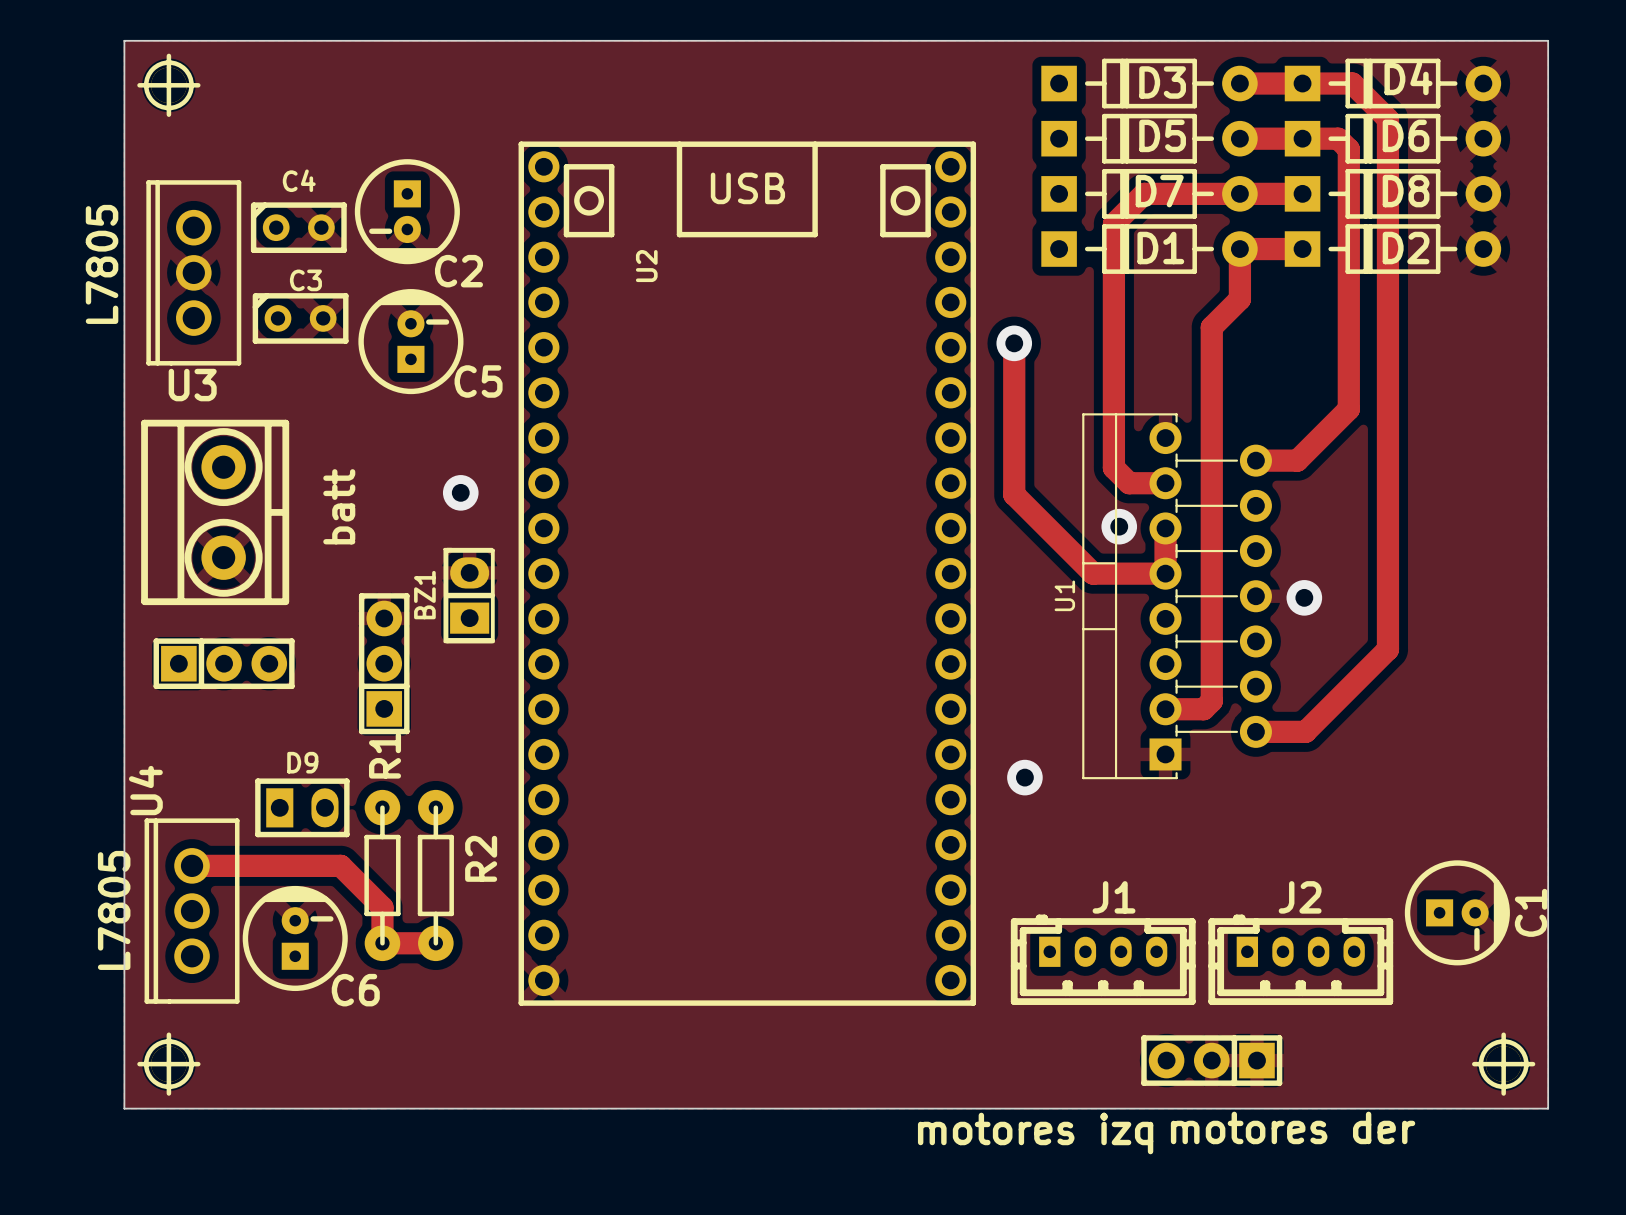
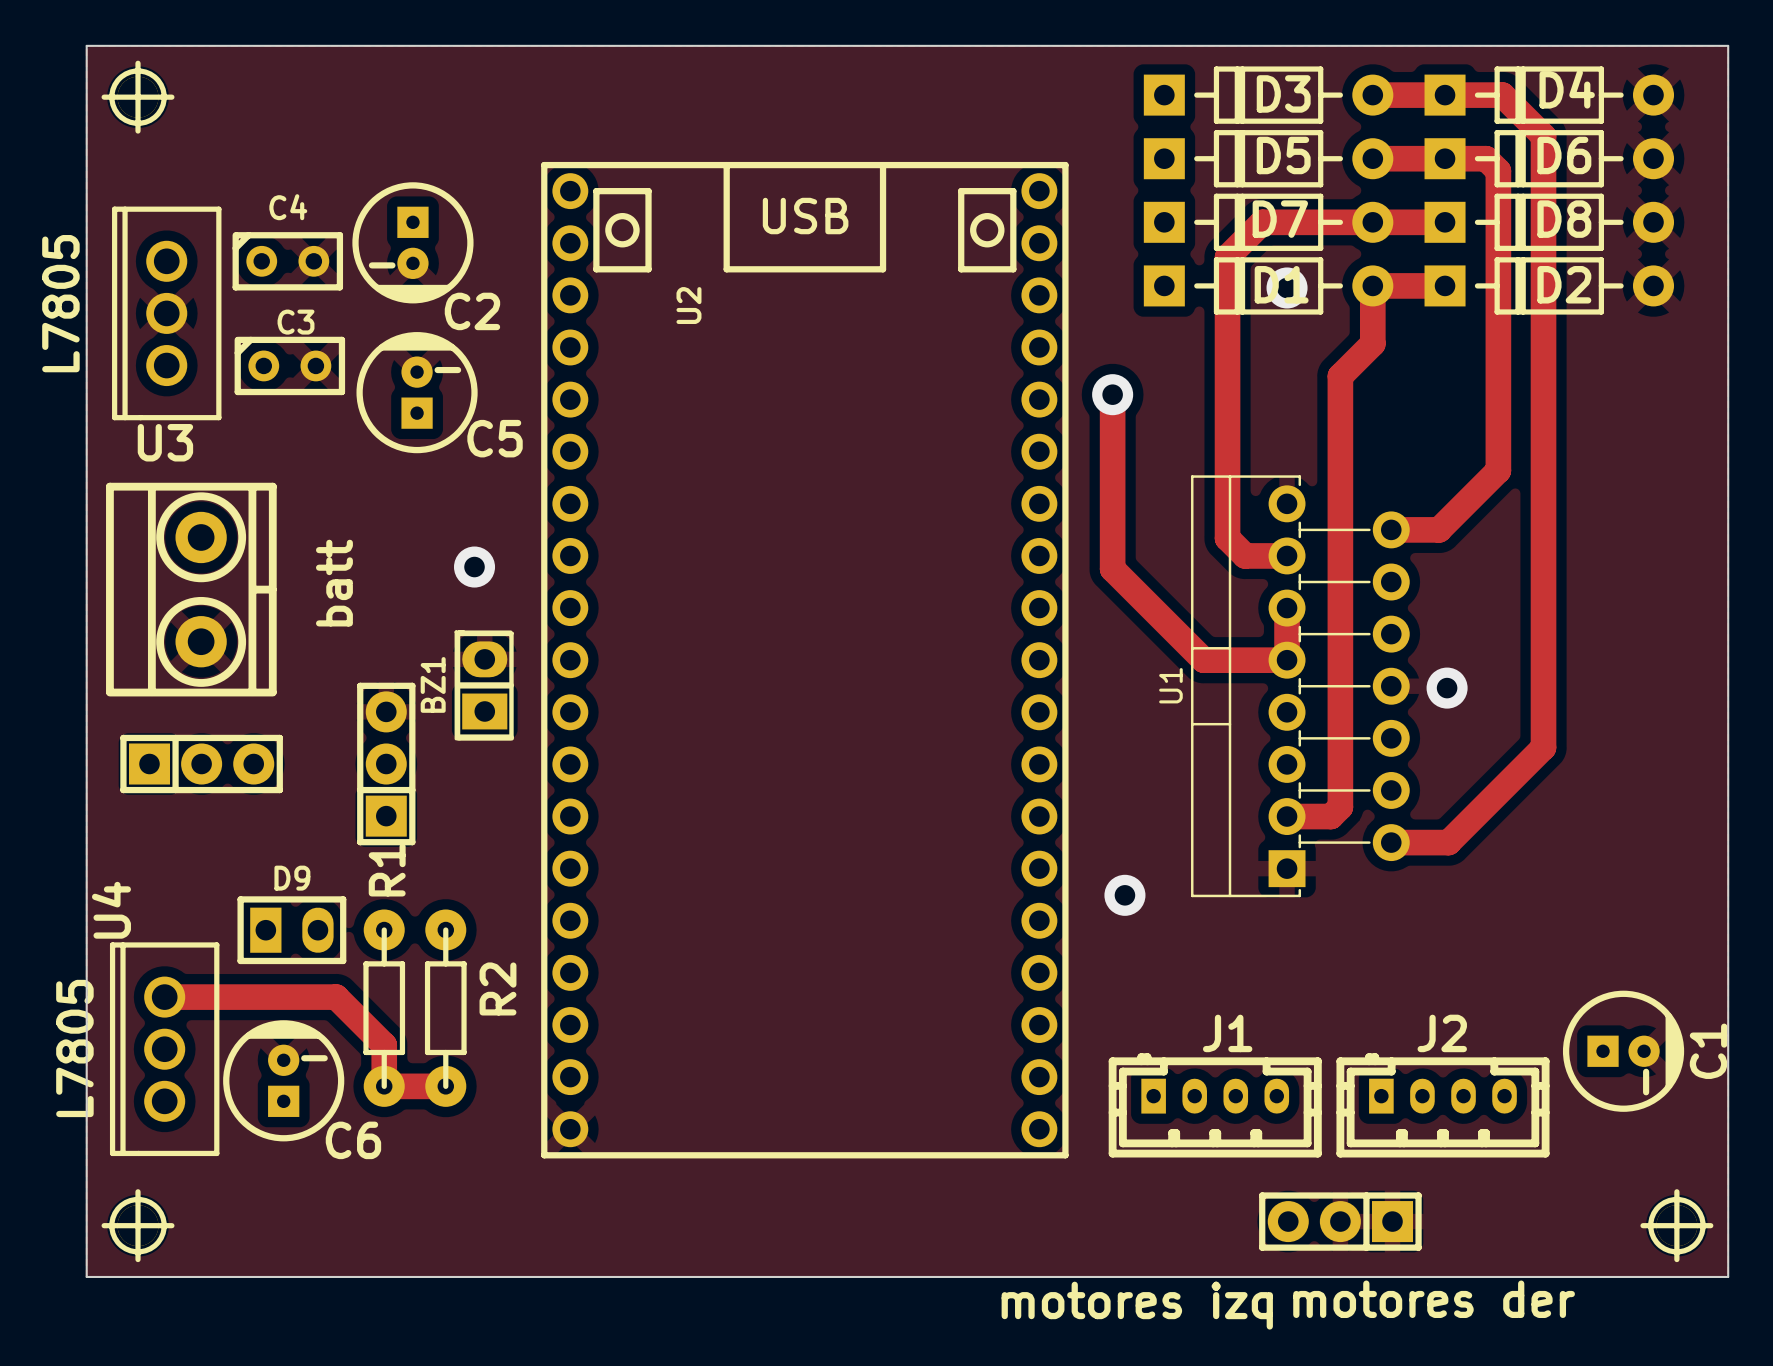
via: none -> (1287, 287)
via: (1119, 526) -> none

